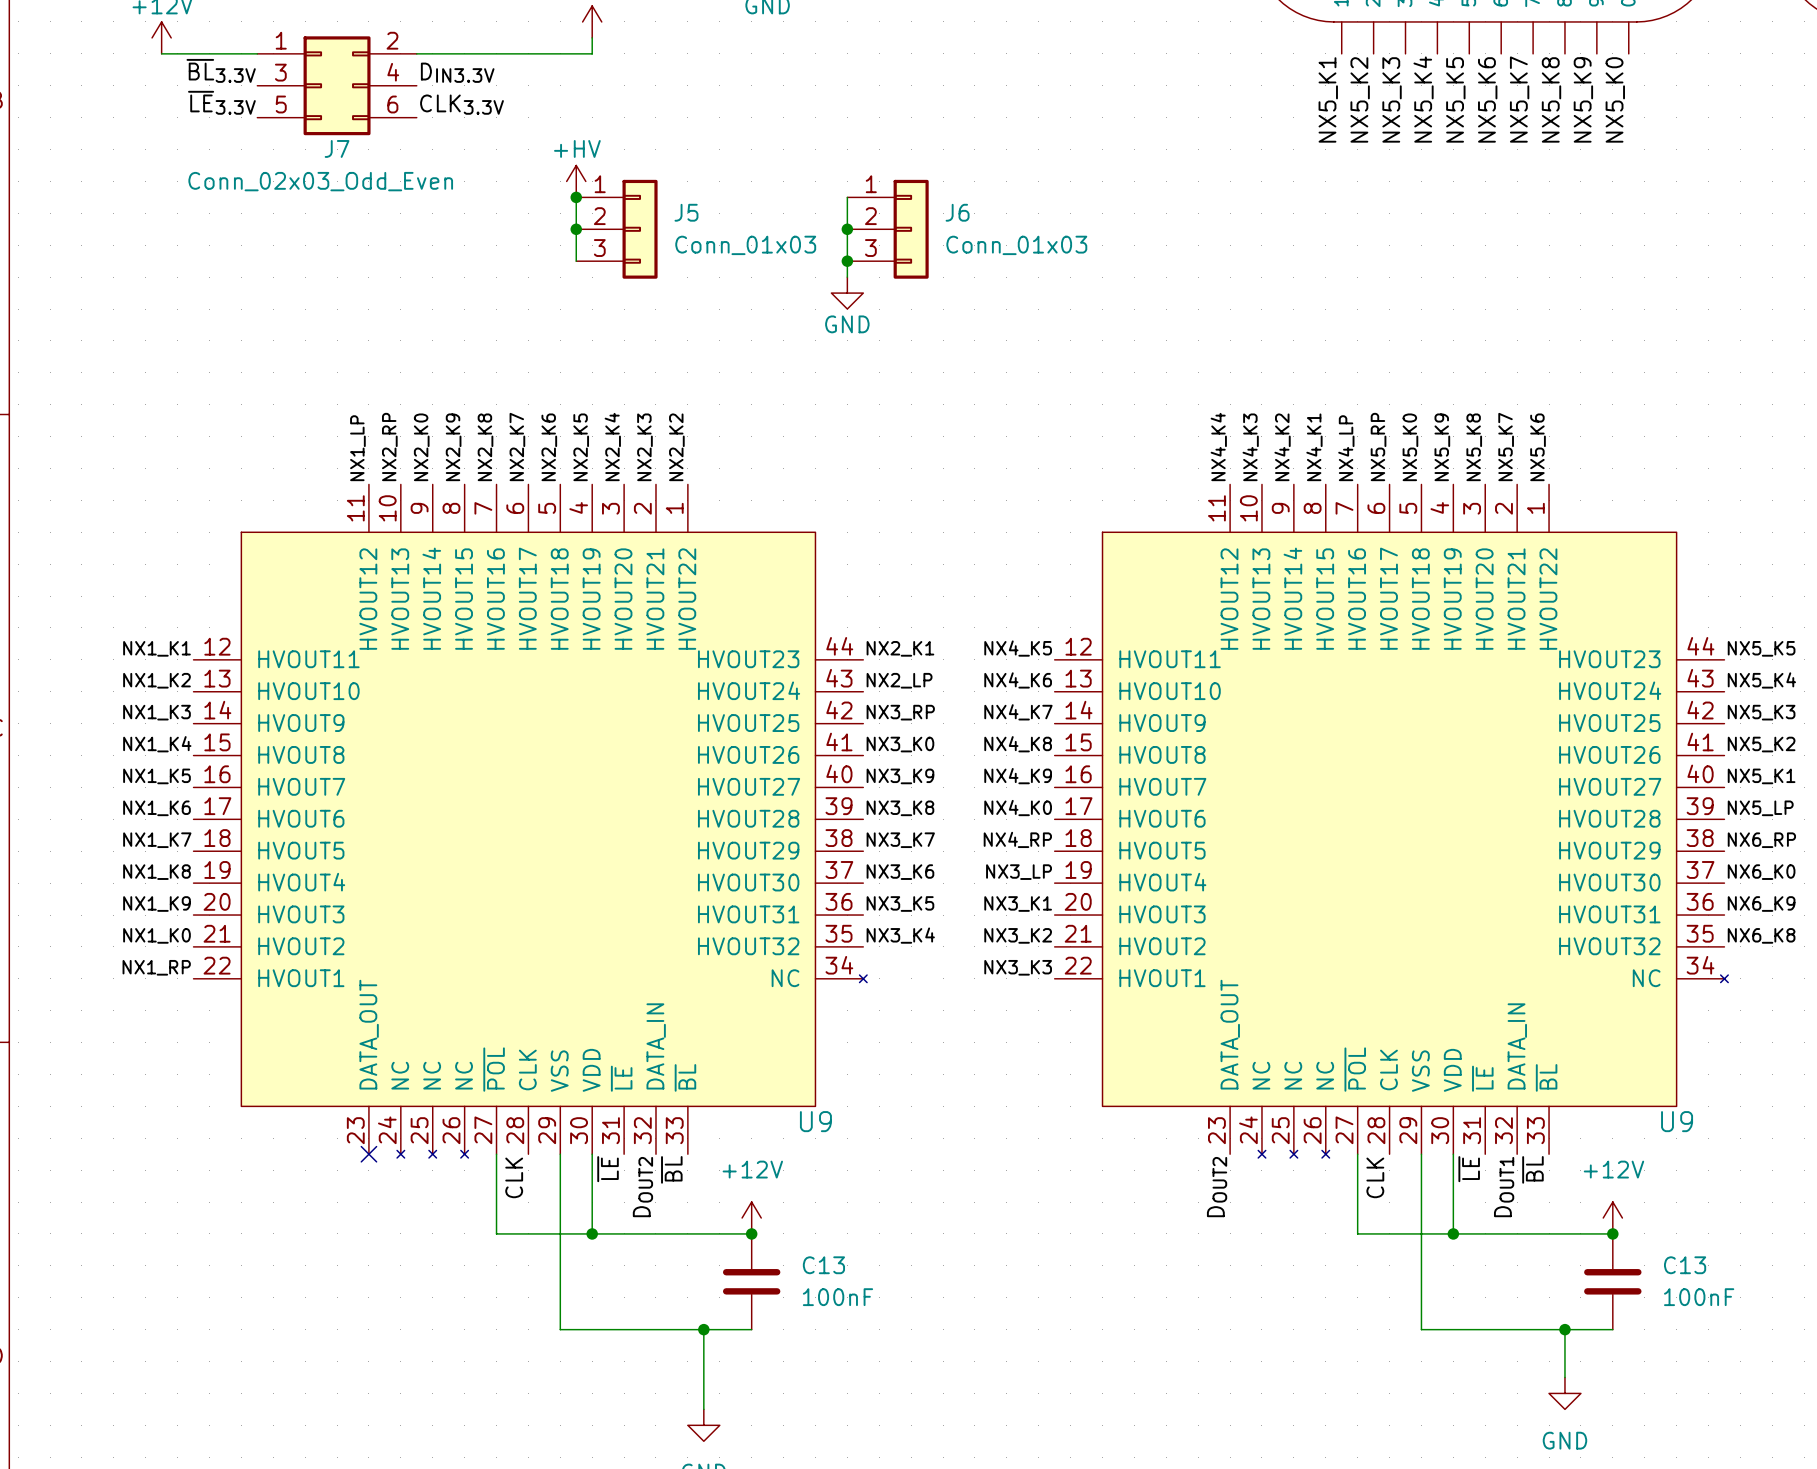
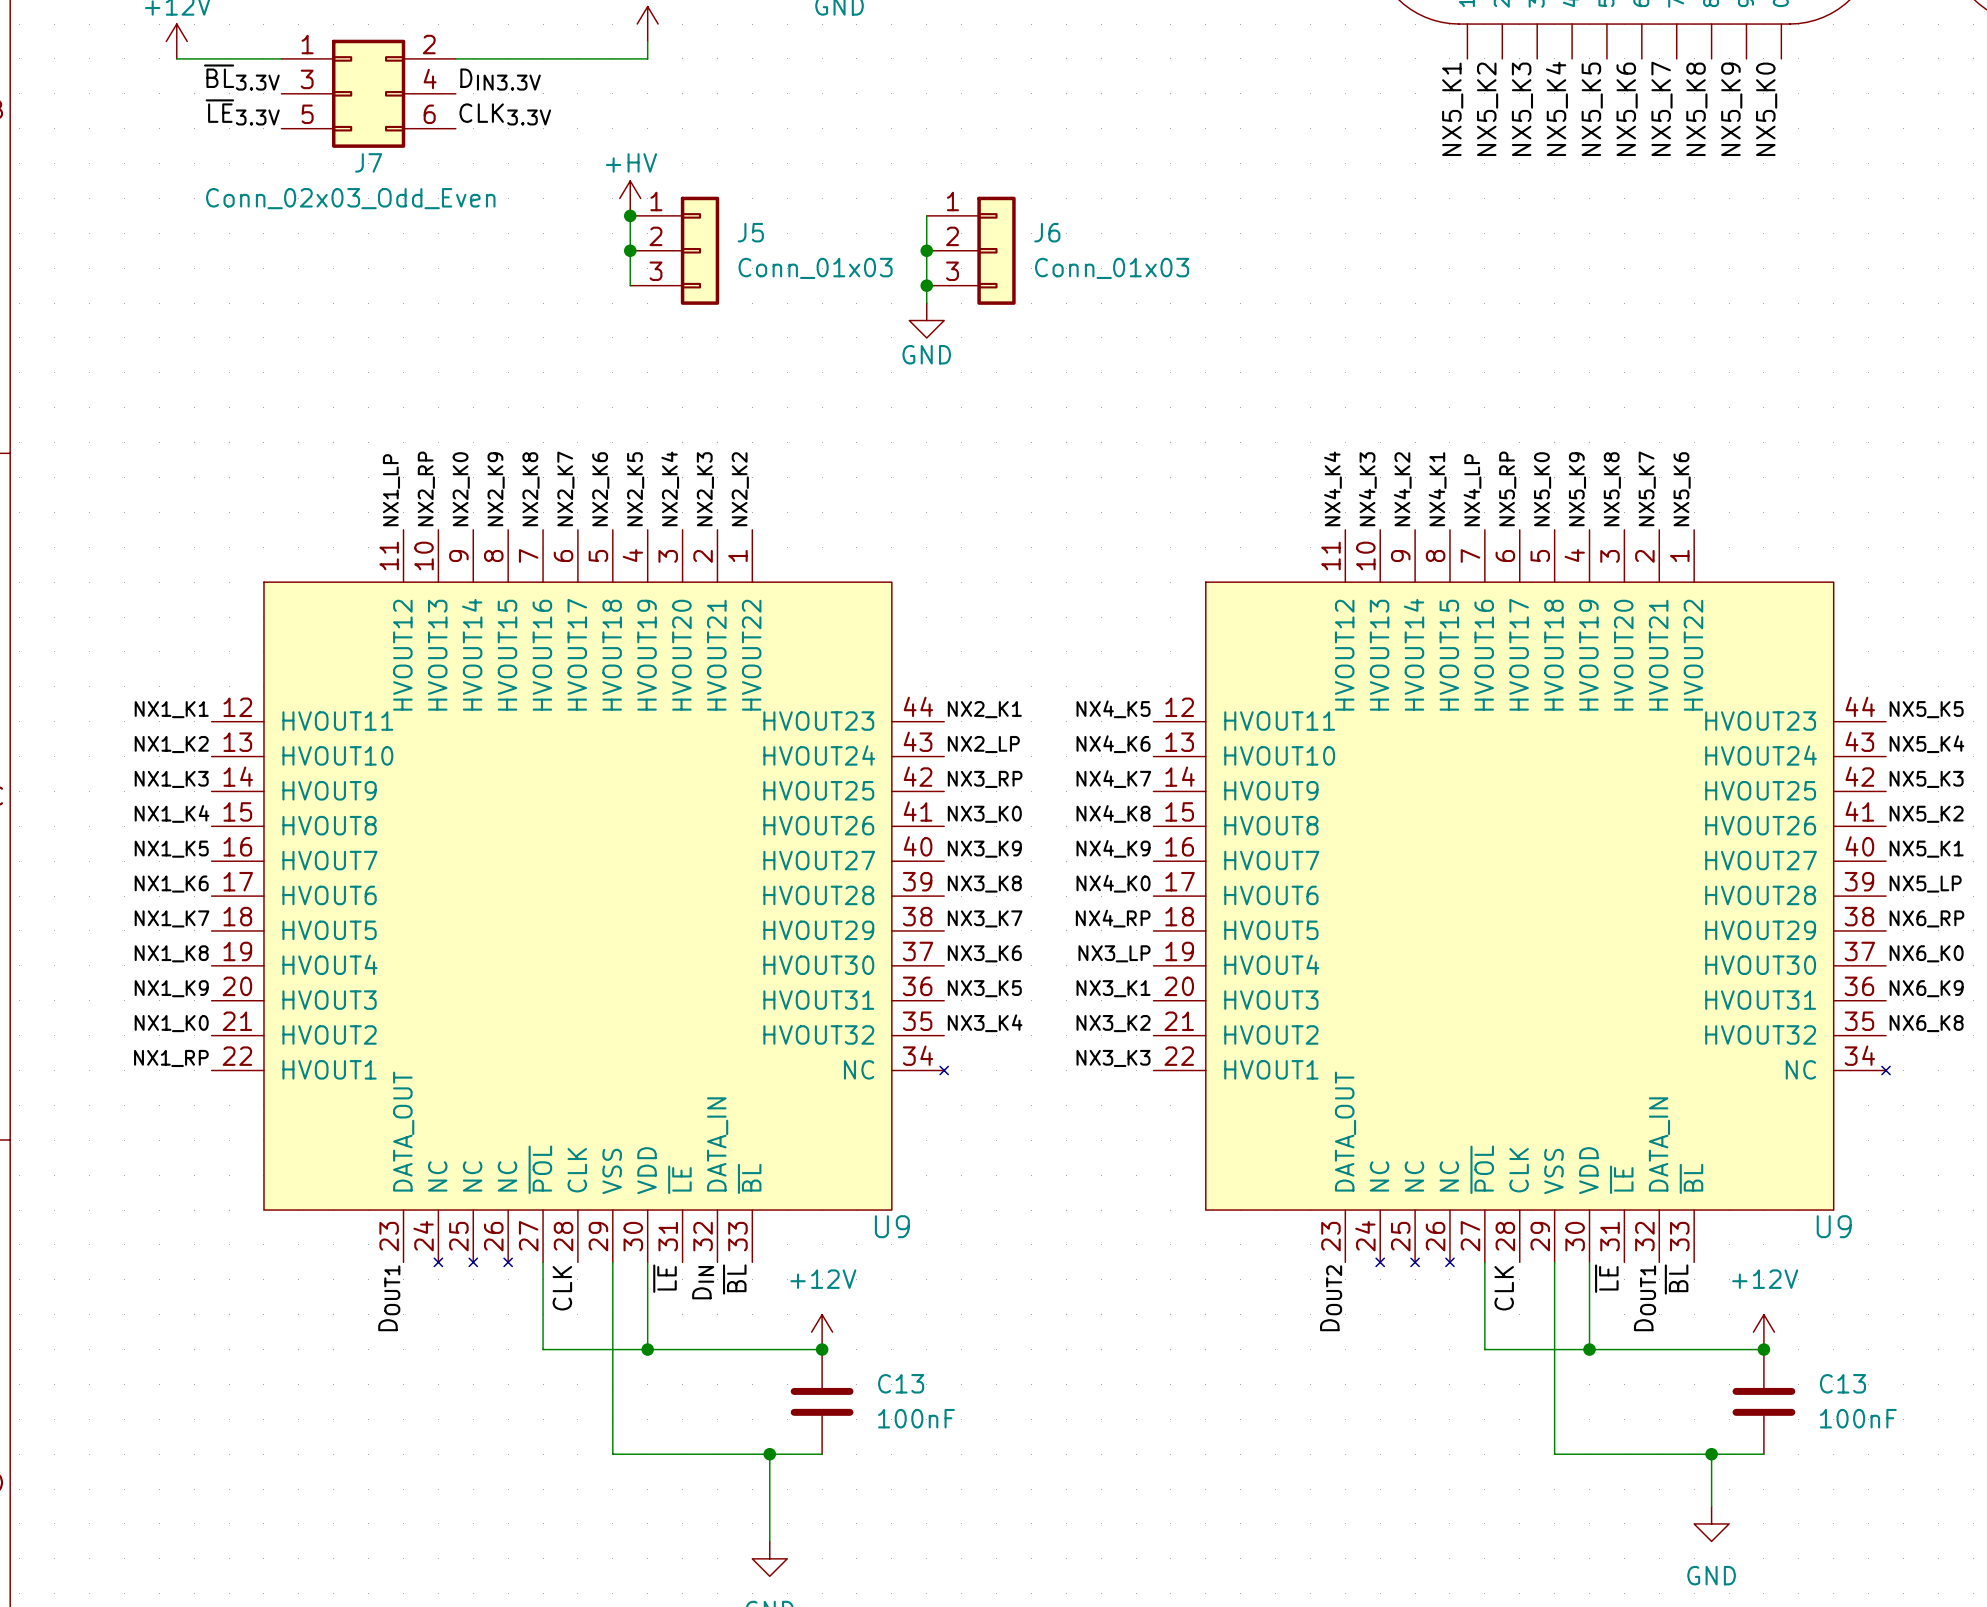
no-connect mark: (368, 1154) -> none
label: none -> DOUT1 (389, 1298)
label: DOUT2 (642, 1187) -> DIN (703, 1282)

